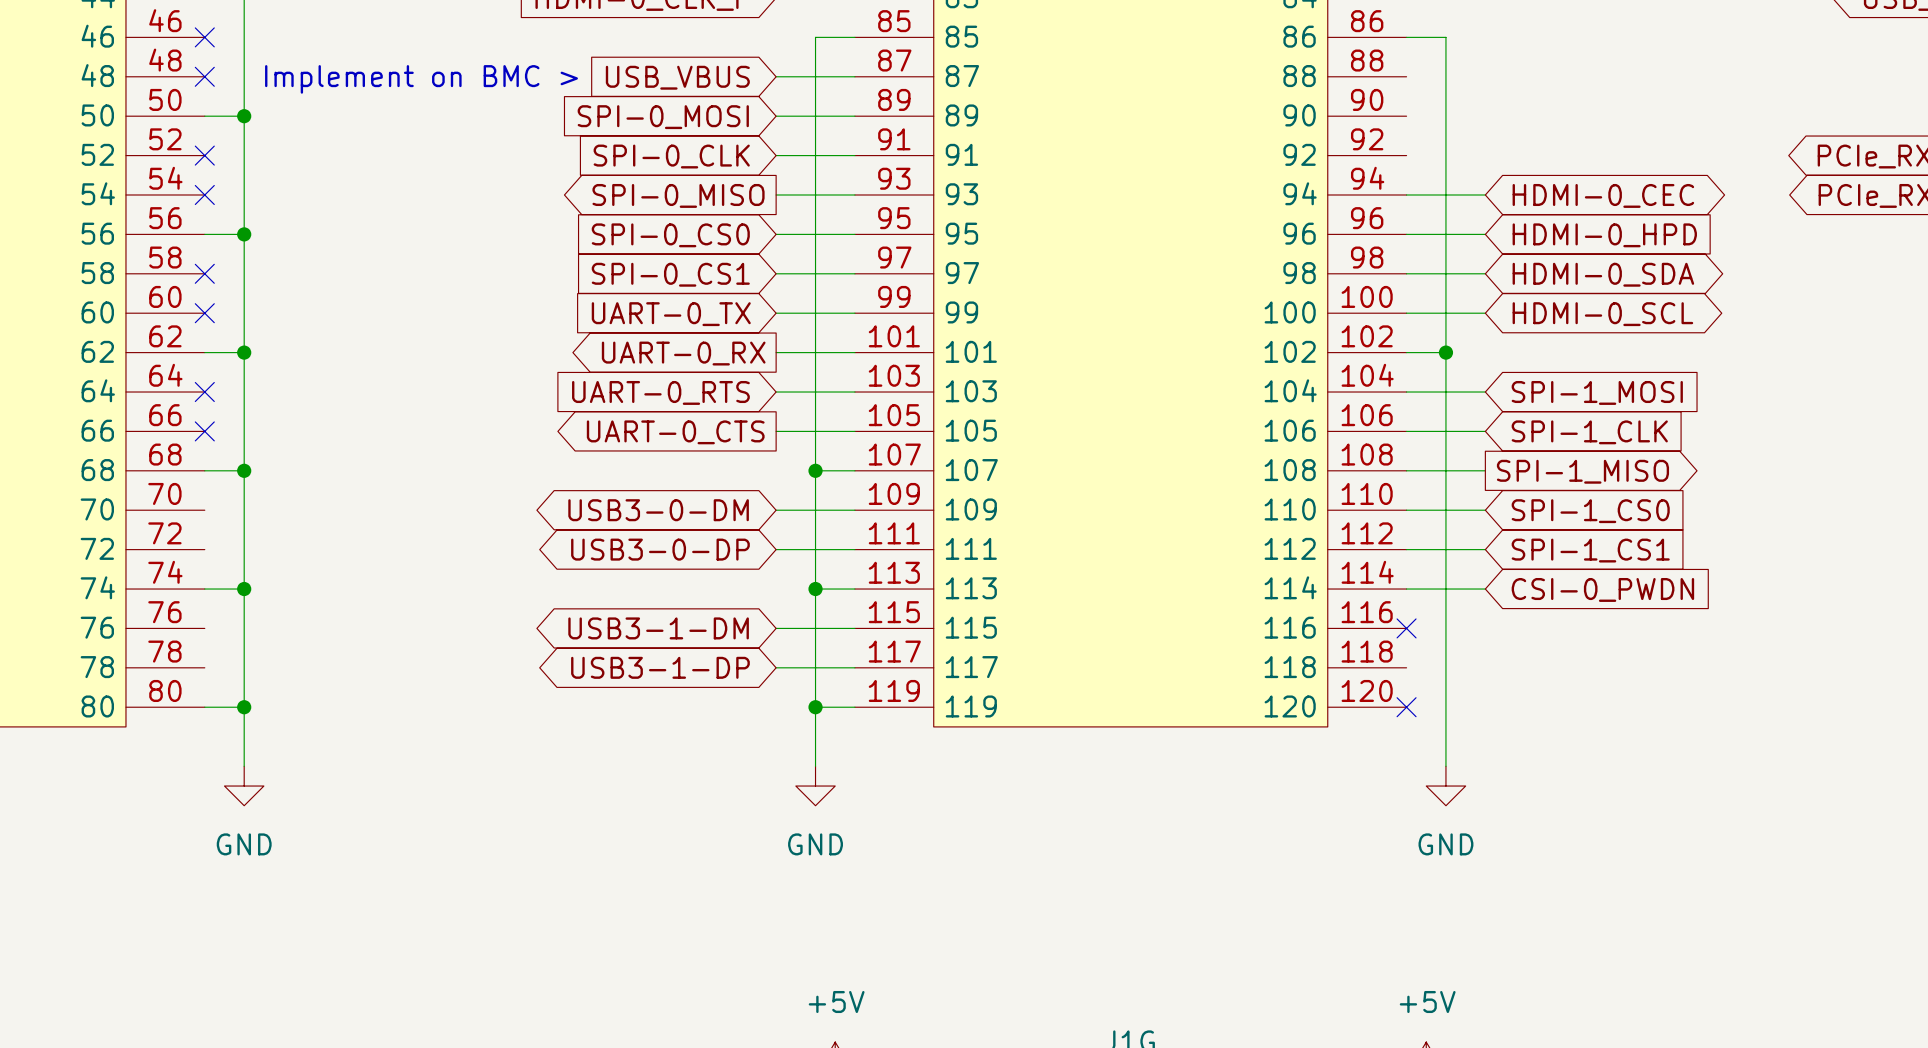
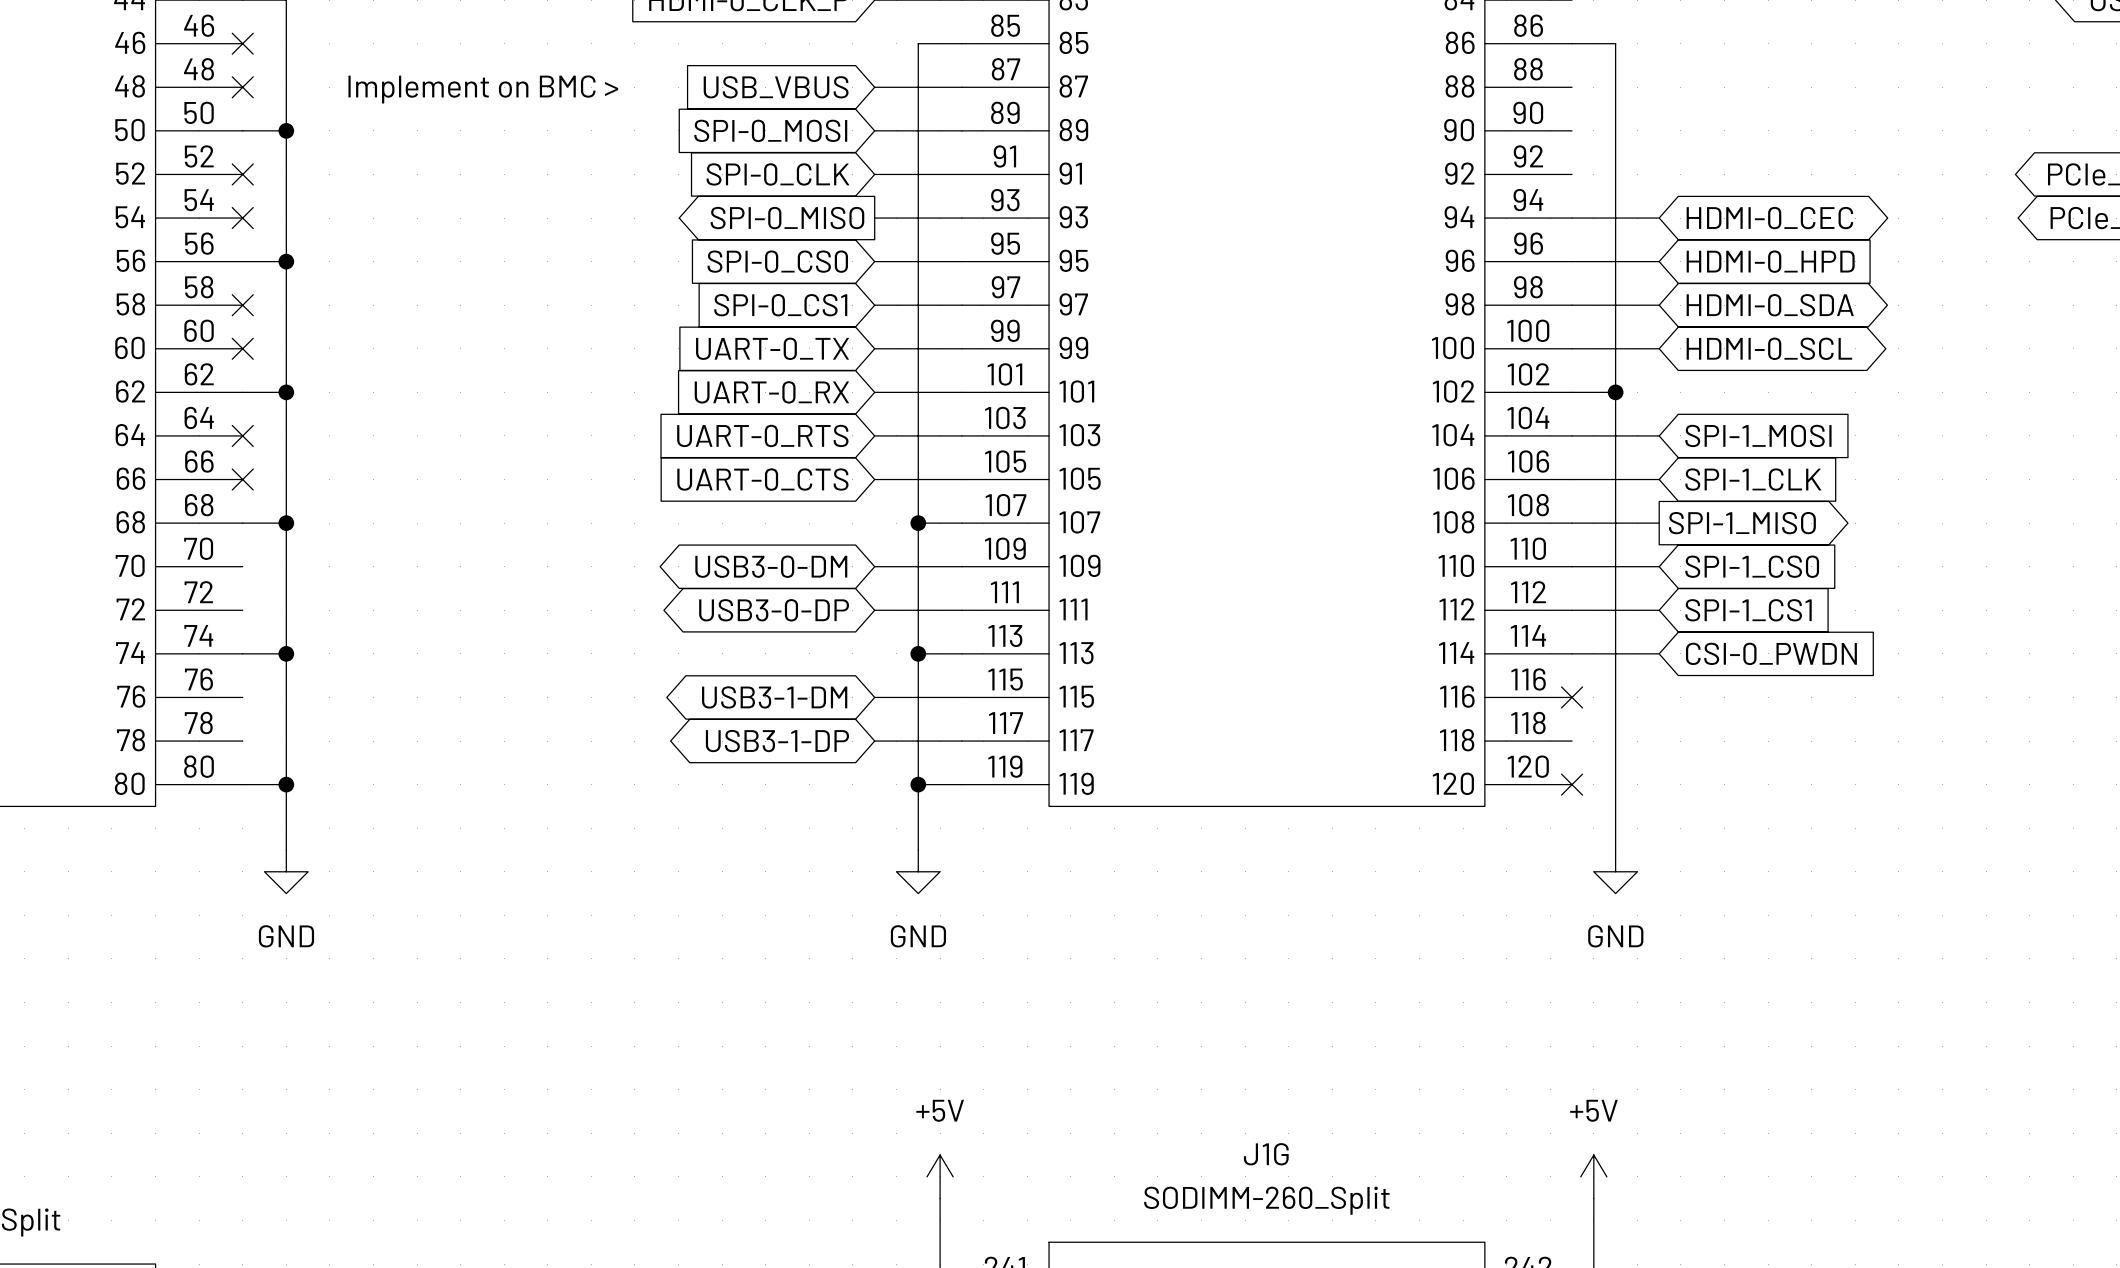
global label shape: output (683, 353) -> input (771, 392)
global label shape: output (675, 432) -> input (762, 479)

